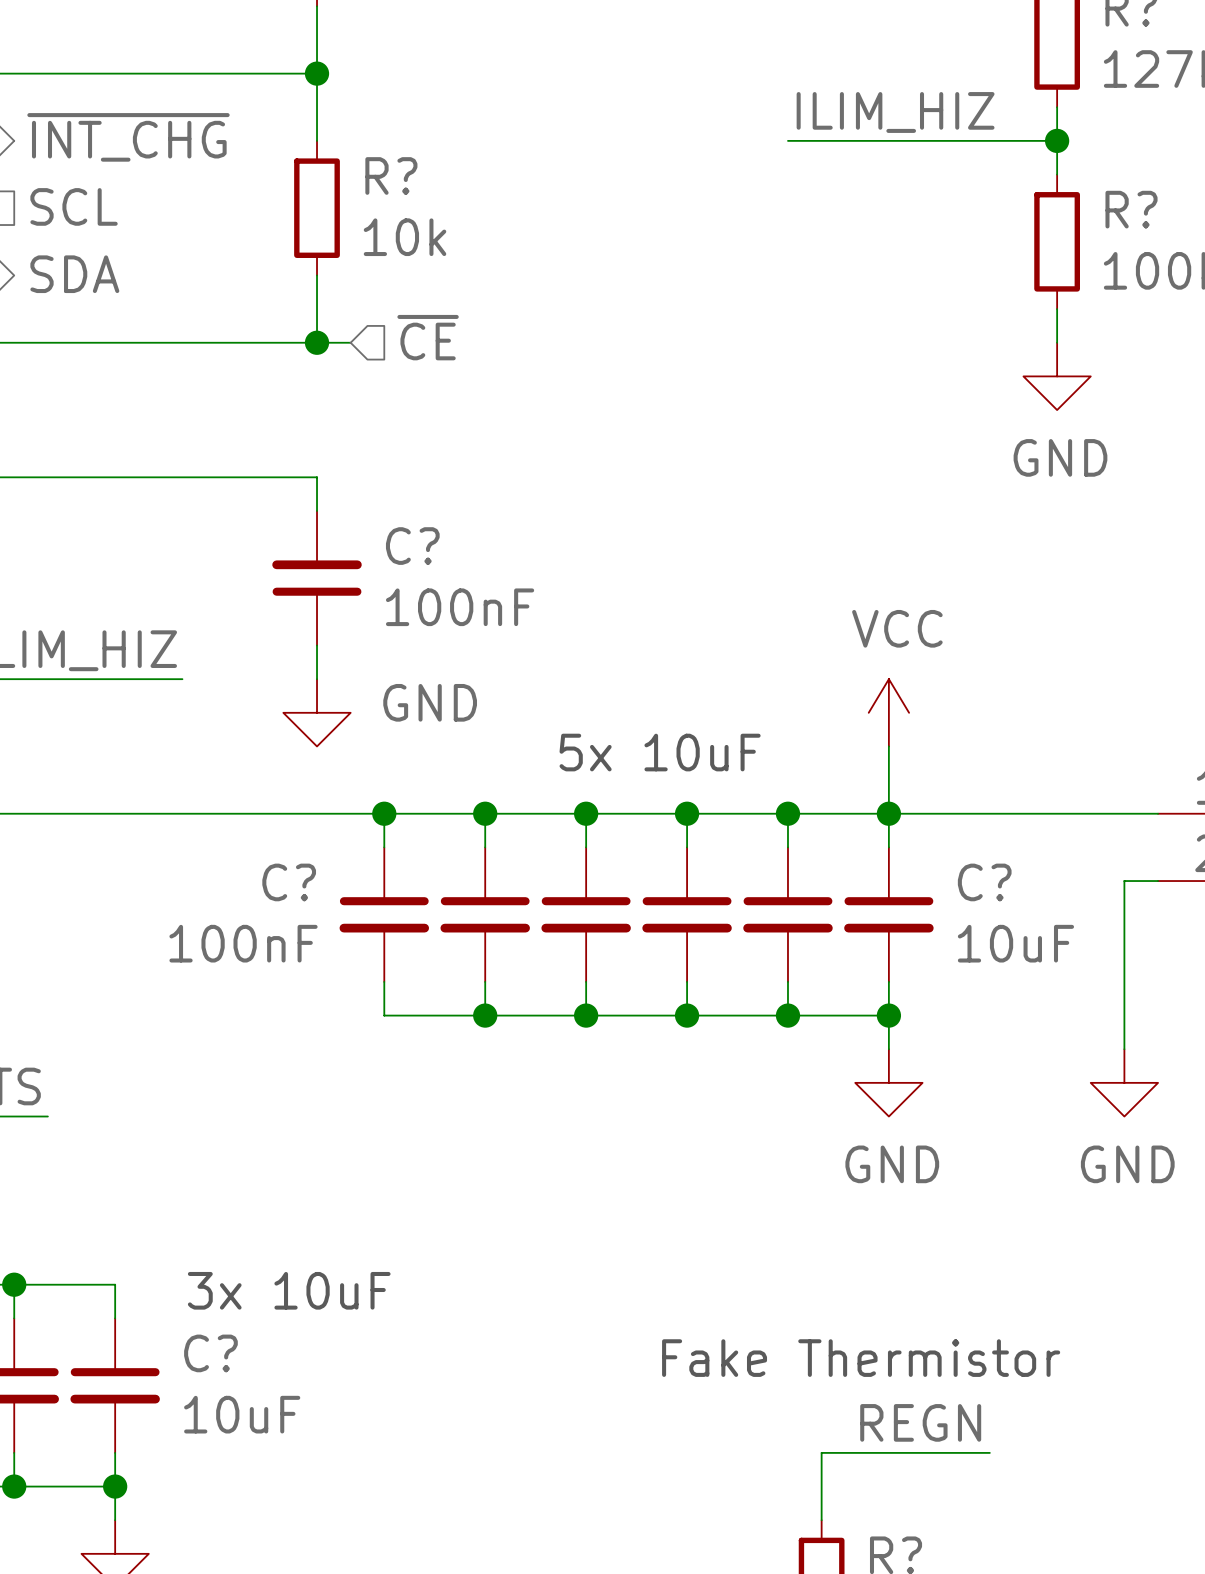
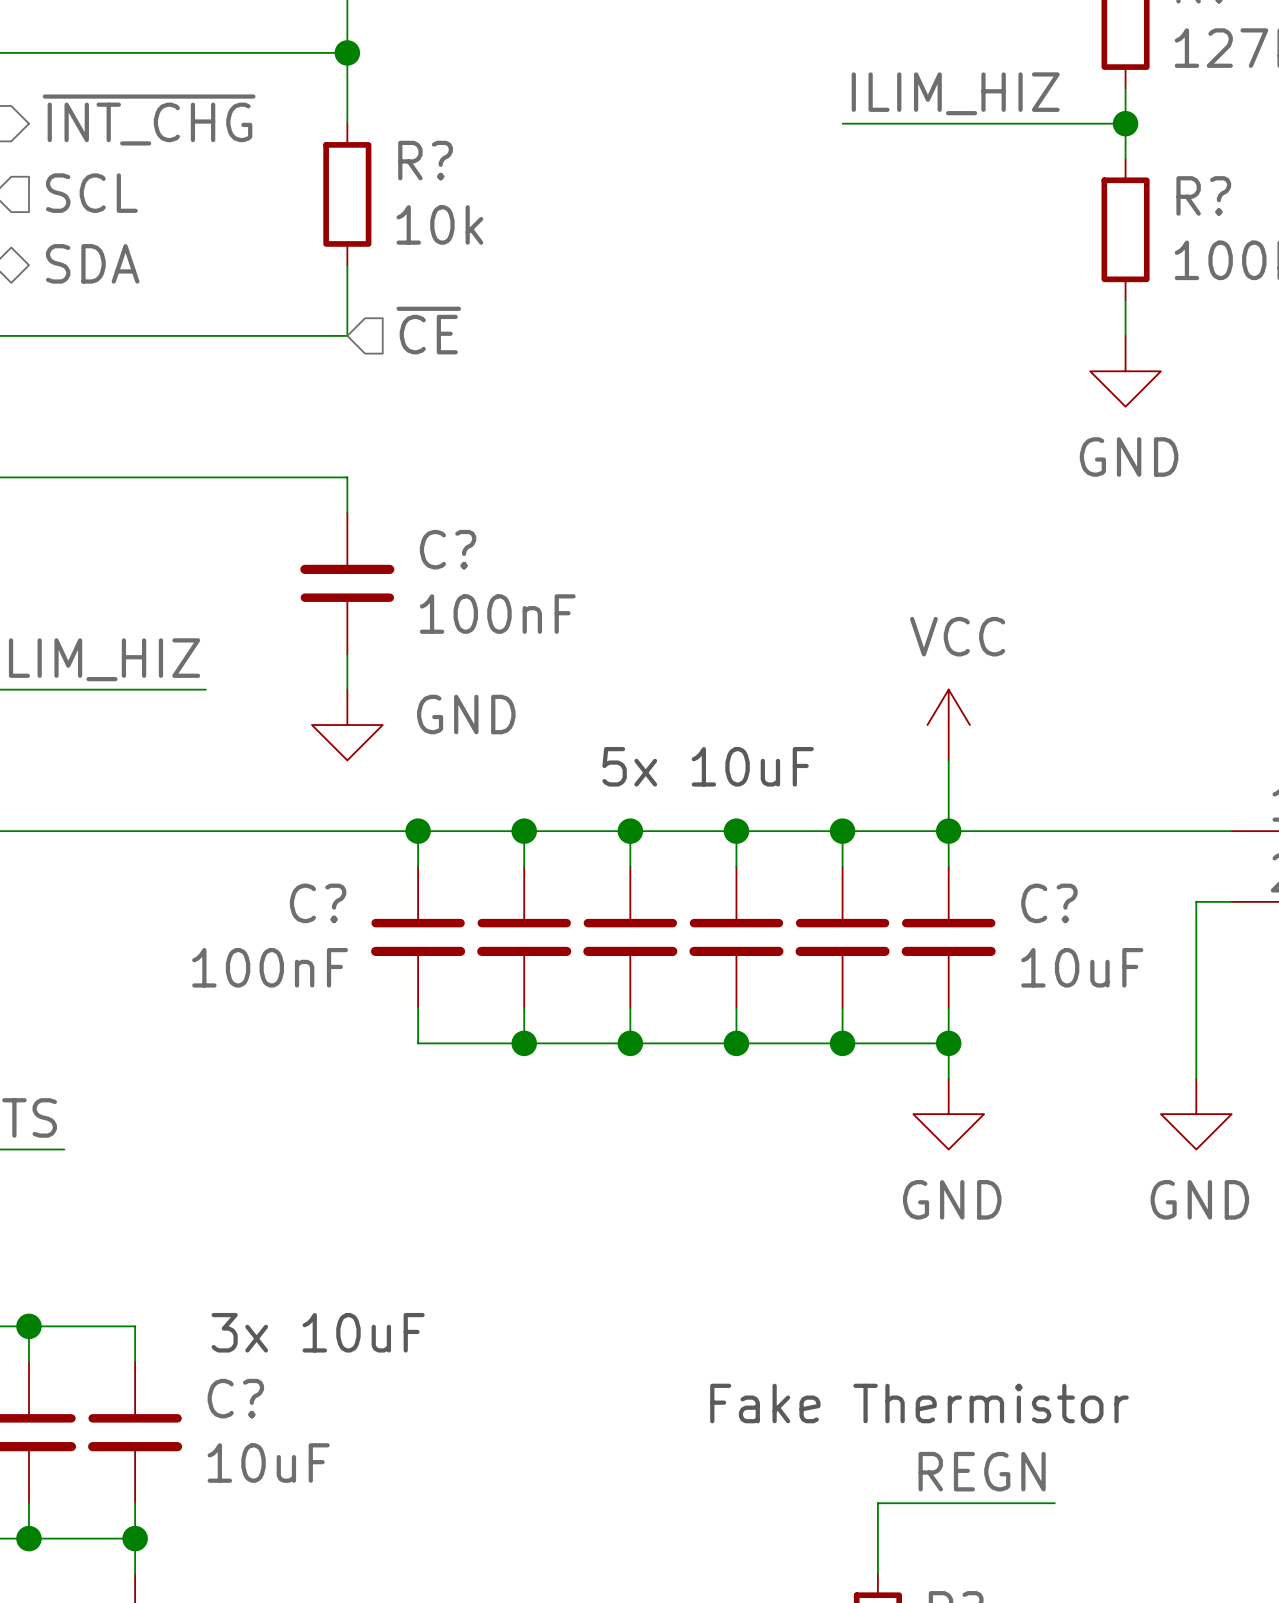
hierarchical label position: ~{CE} (428, 337) -> ~{CE} (428, 330)
wire: (317, 342) (350, 342) -> none
junction: (317, 342) -> none

